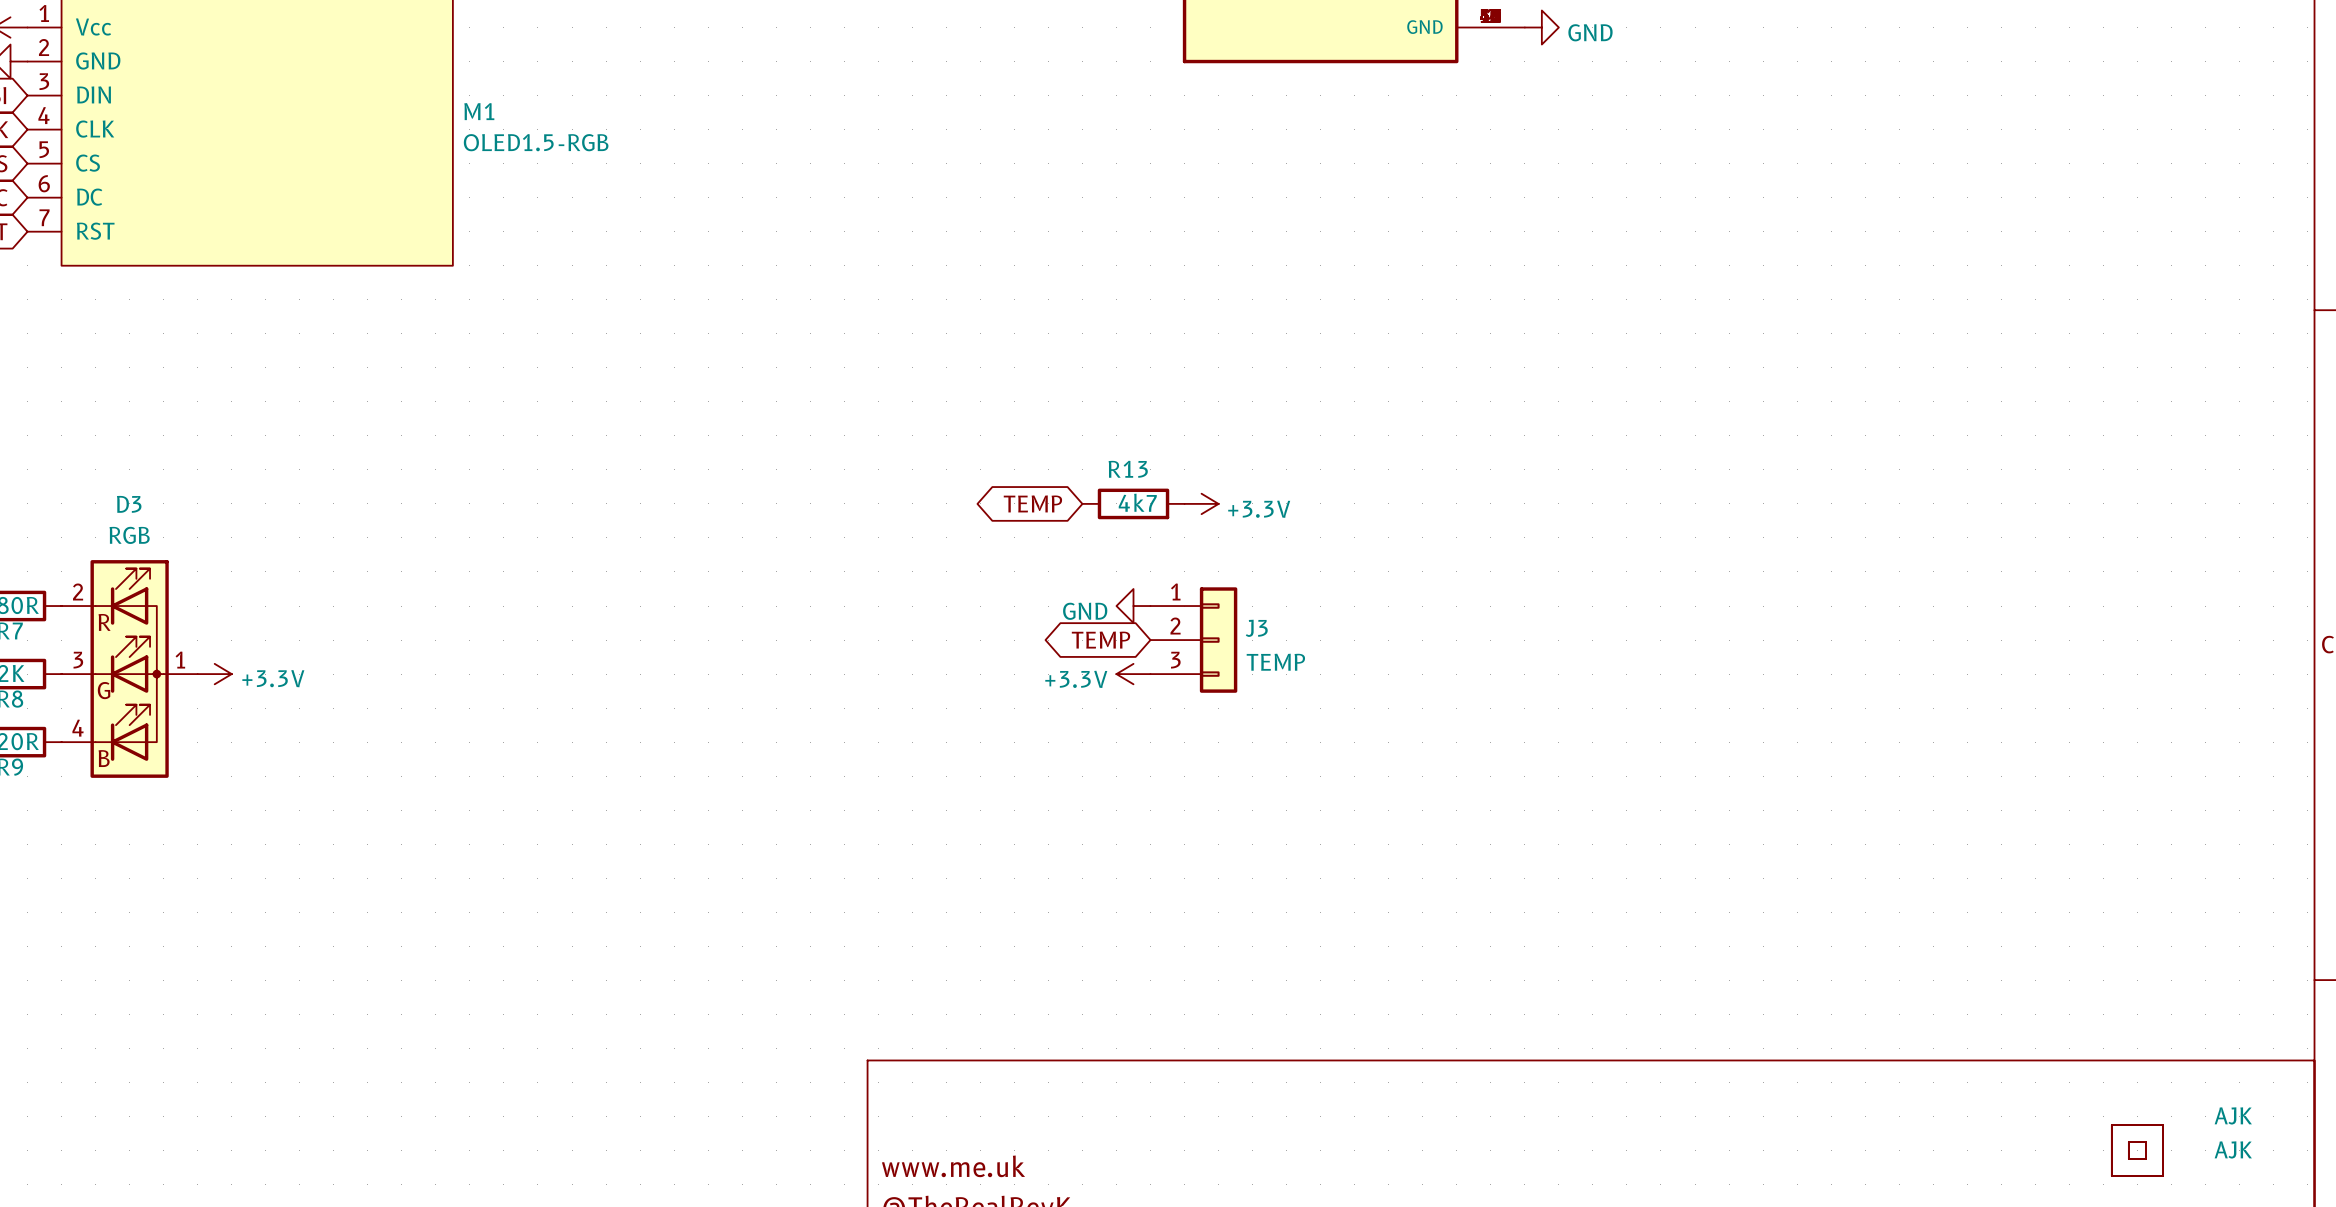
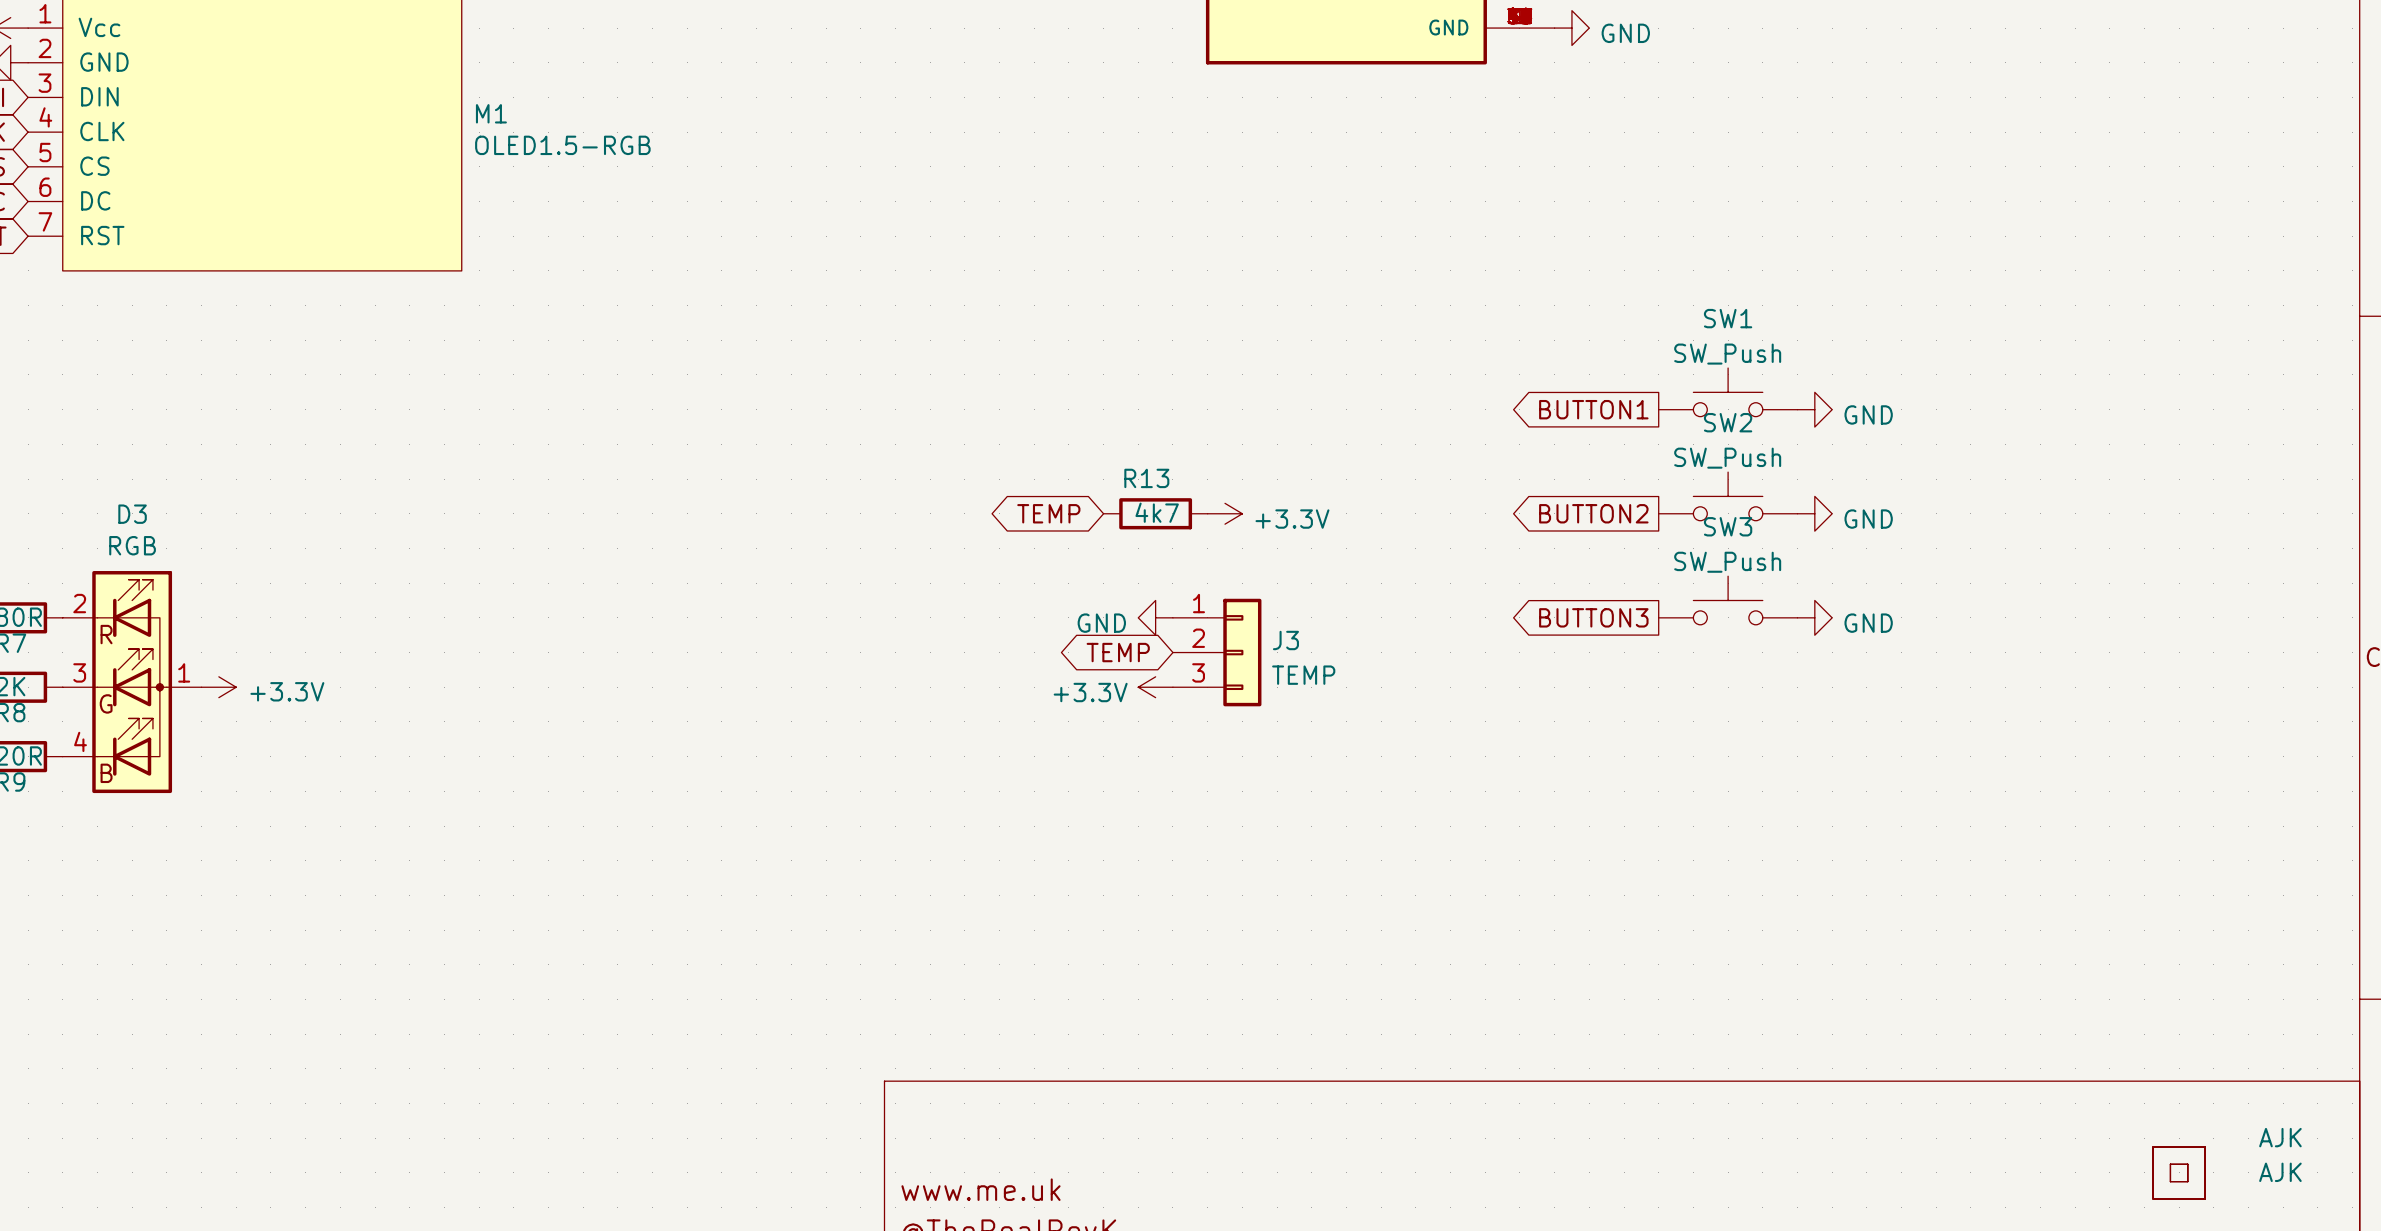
SW1: none -> SW_Push (1728, 392)
global label: none -> BUTTON1 (1593, 409)
power symbol: none -> GND (1814, 409)
SW2: none -> SW_Push (1728, 496)
power symbol: none -> GND (1814, 513)
global label: none -> BUTTON2 (1593, 513)
SW3: none -> SW_Push (1728, 600)
global label: none -> BUTTON3 (1593, 617)
power symbol: none -> GND (1814, 617)

